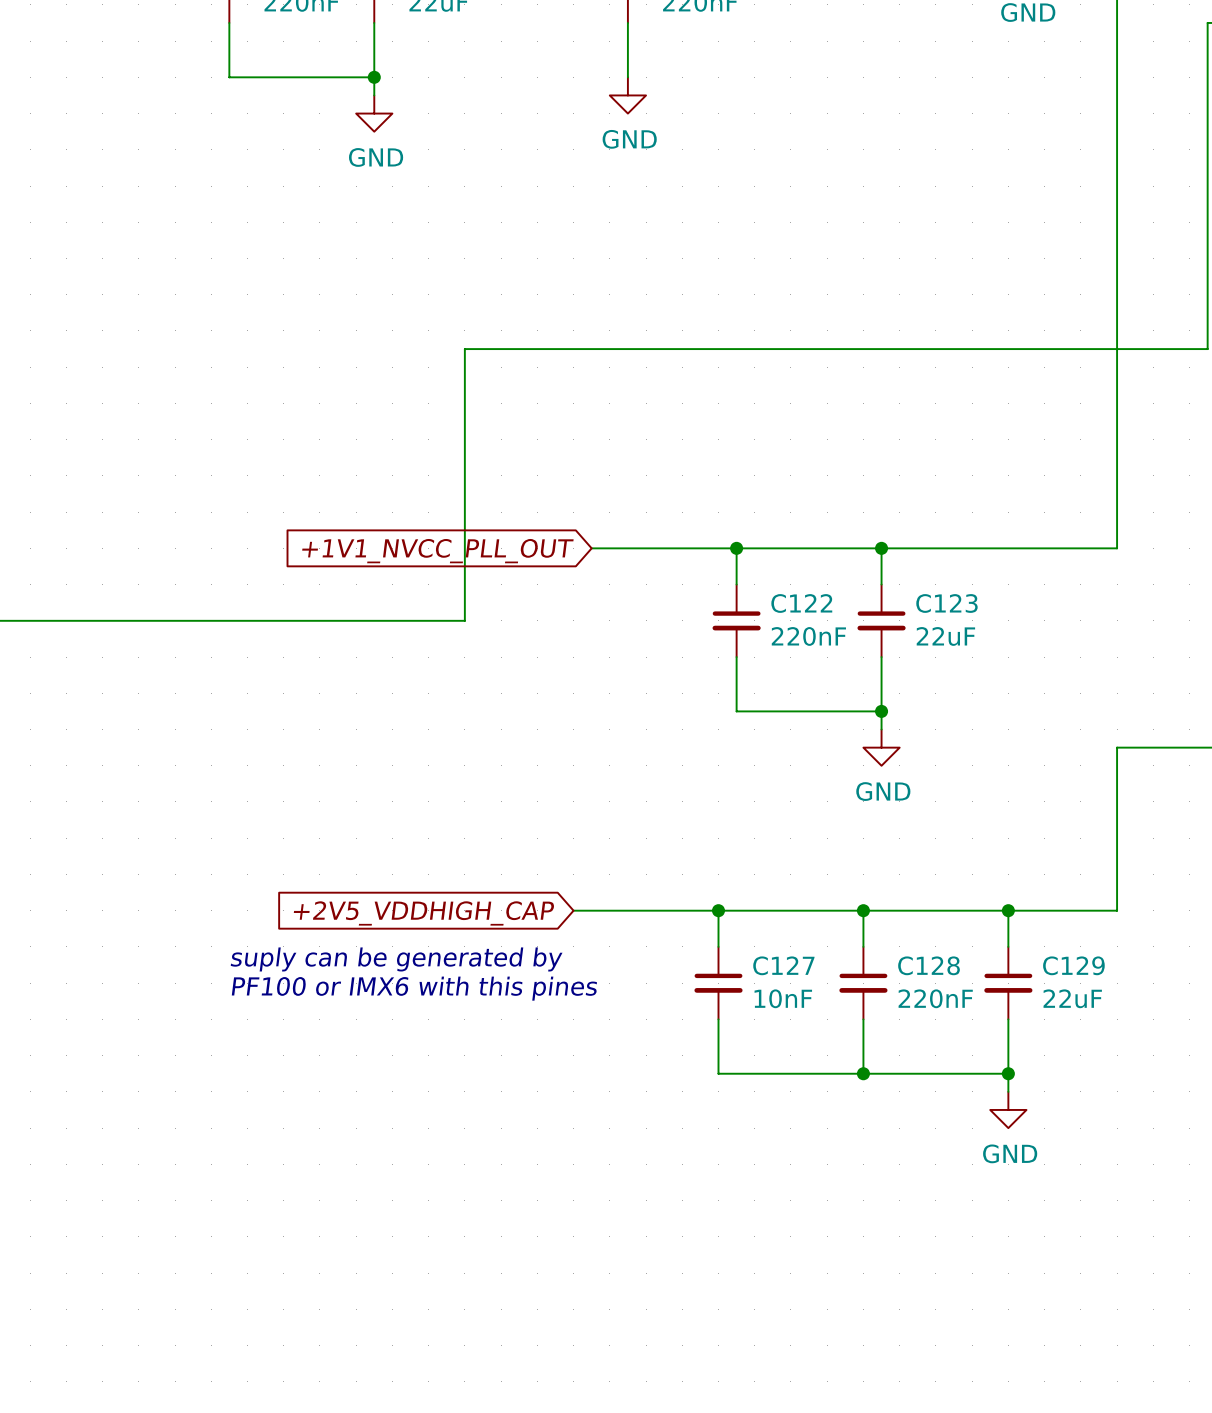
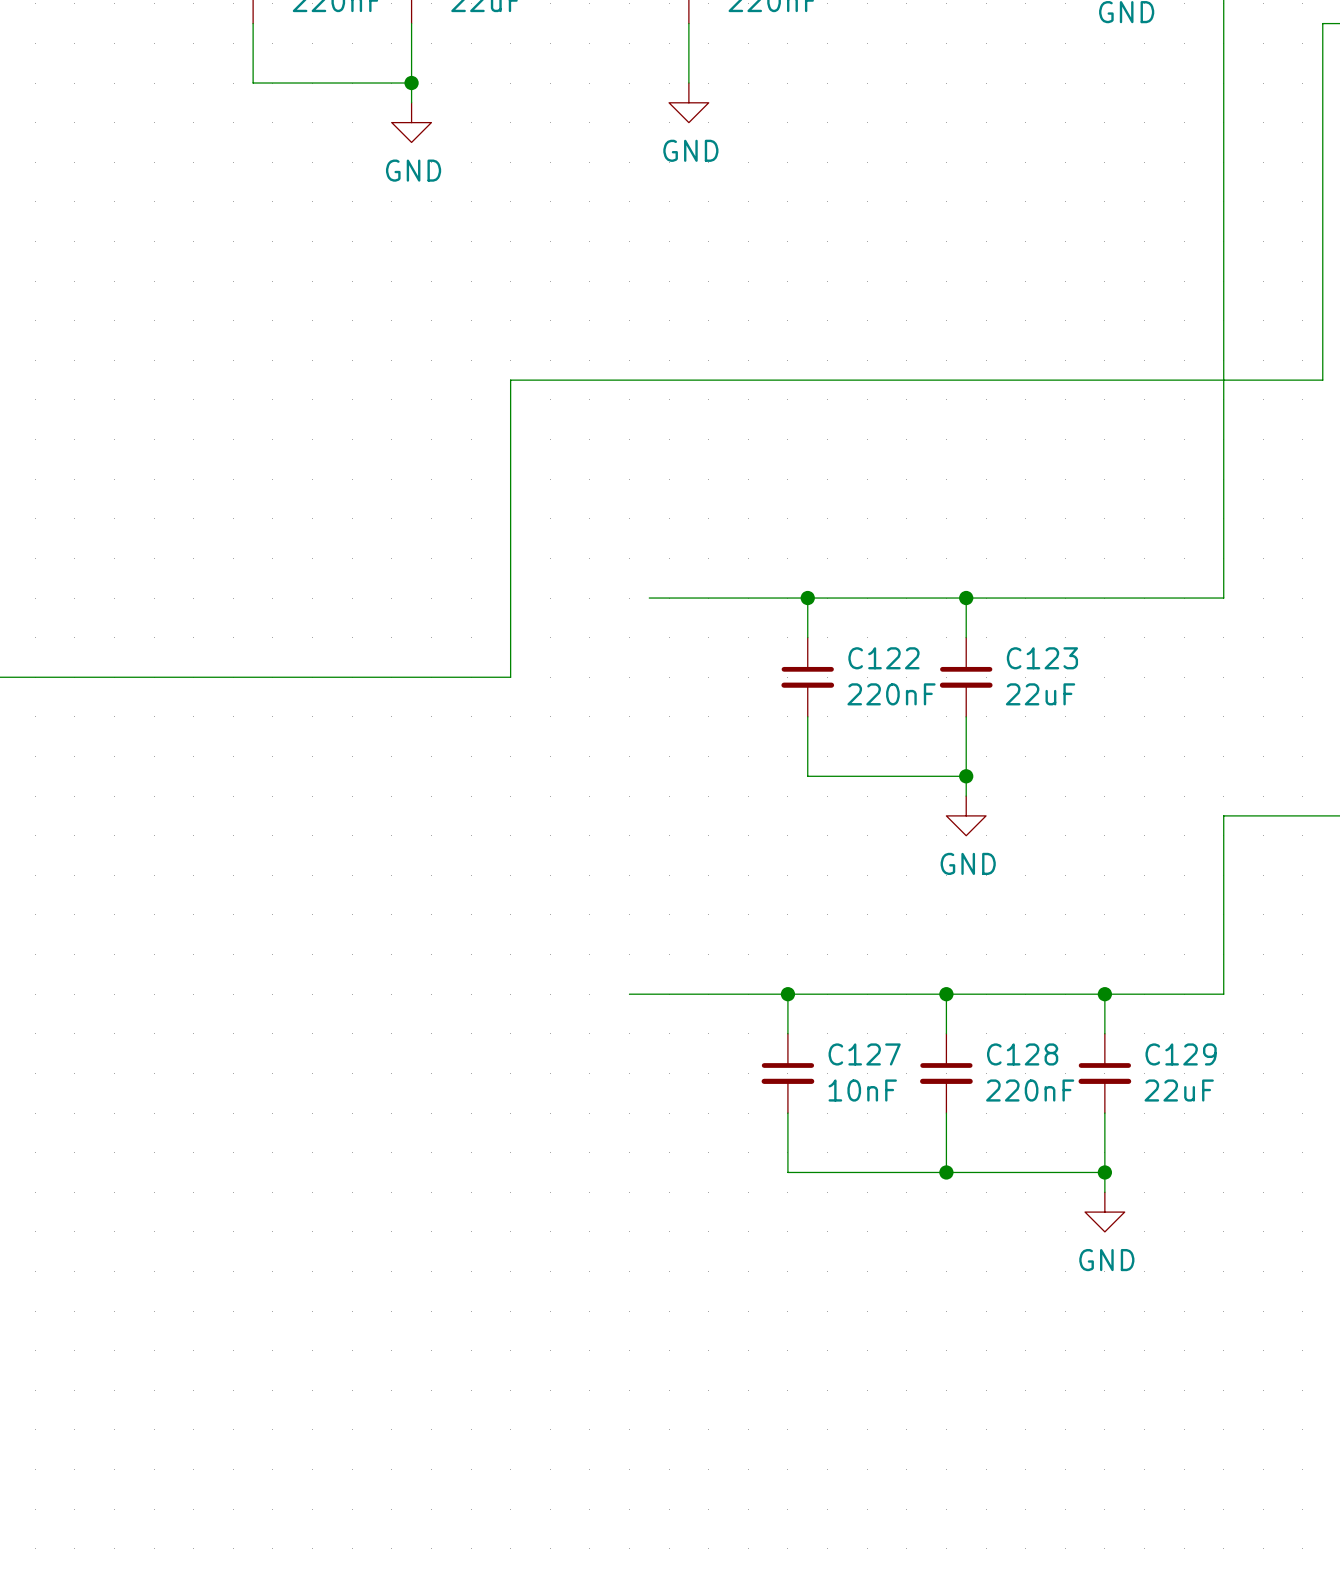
global label: +1V1_NVCC_PLL_OUT (437, 551) -> none
global label: +2V5_VDDHIGH_CAP (424, 913) -> none
text: suply can be generated by (396, 959) -> none
text: PF100 or IMX6 with this pines (414, 988) -> none

